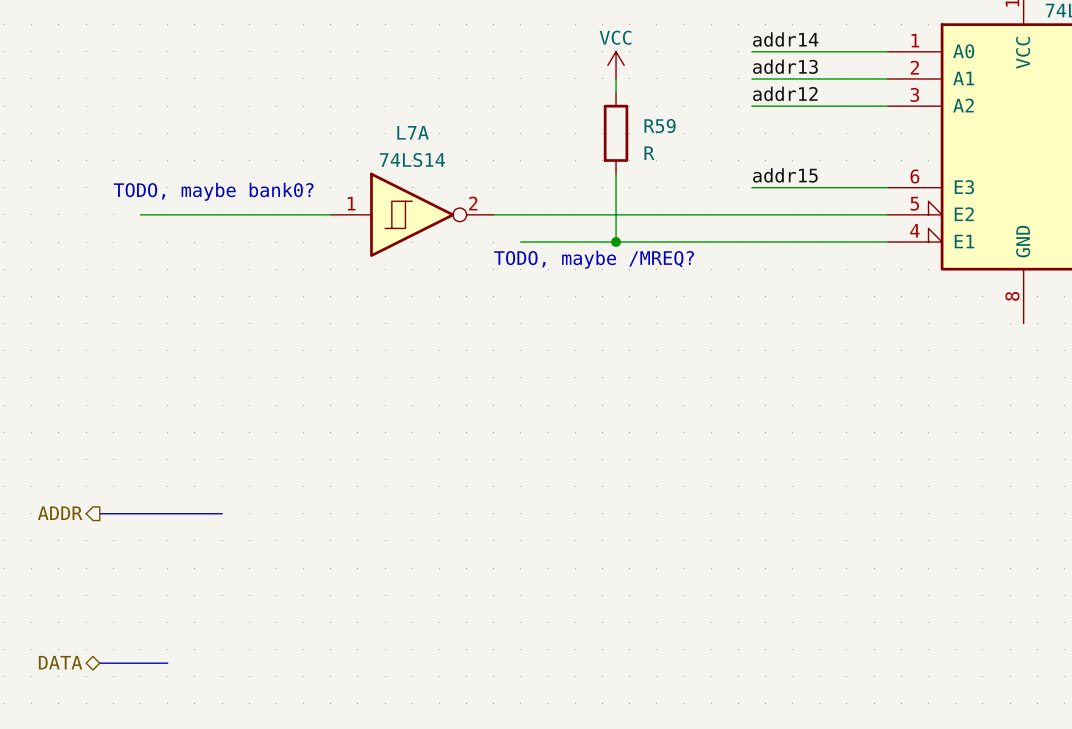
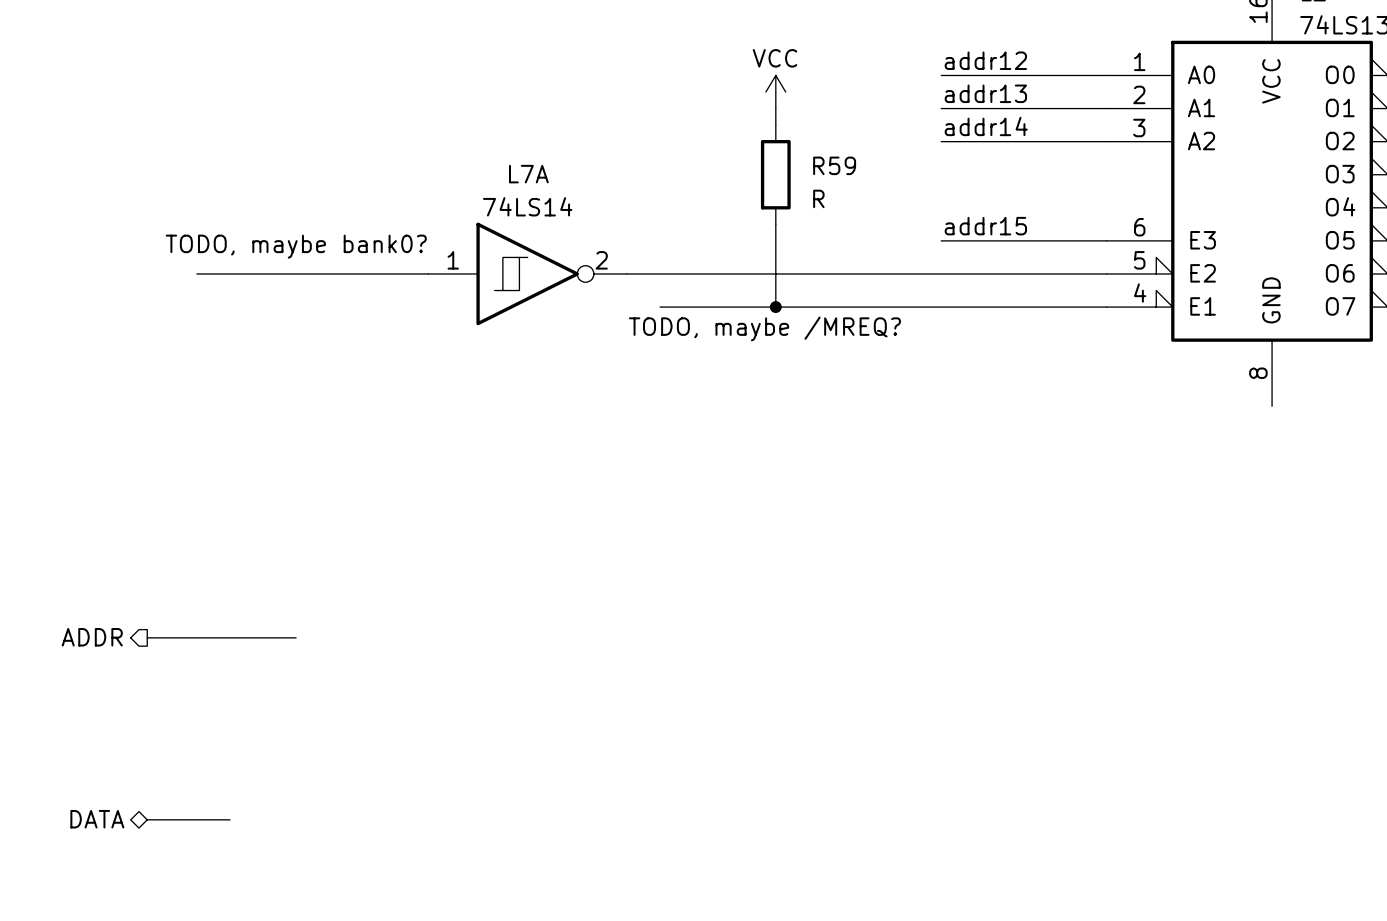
label: addr14 (785, 39) -> addr12 (985, 60)
label: addr12 (785, 93) -> addr14 (986, 126)

